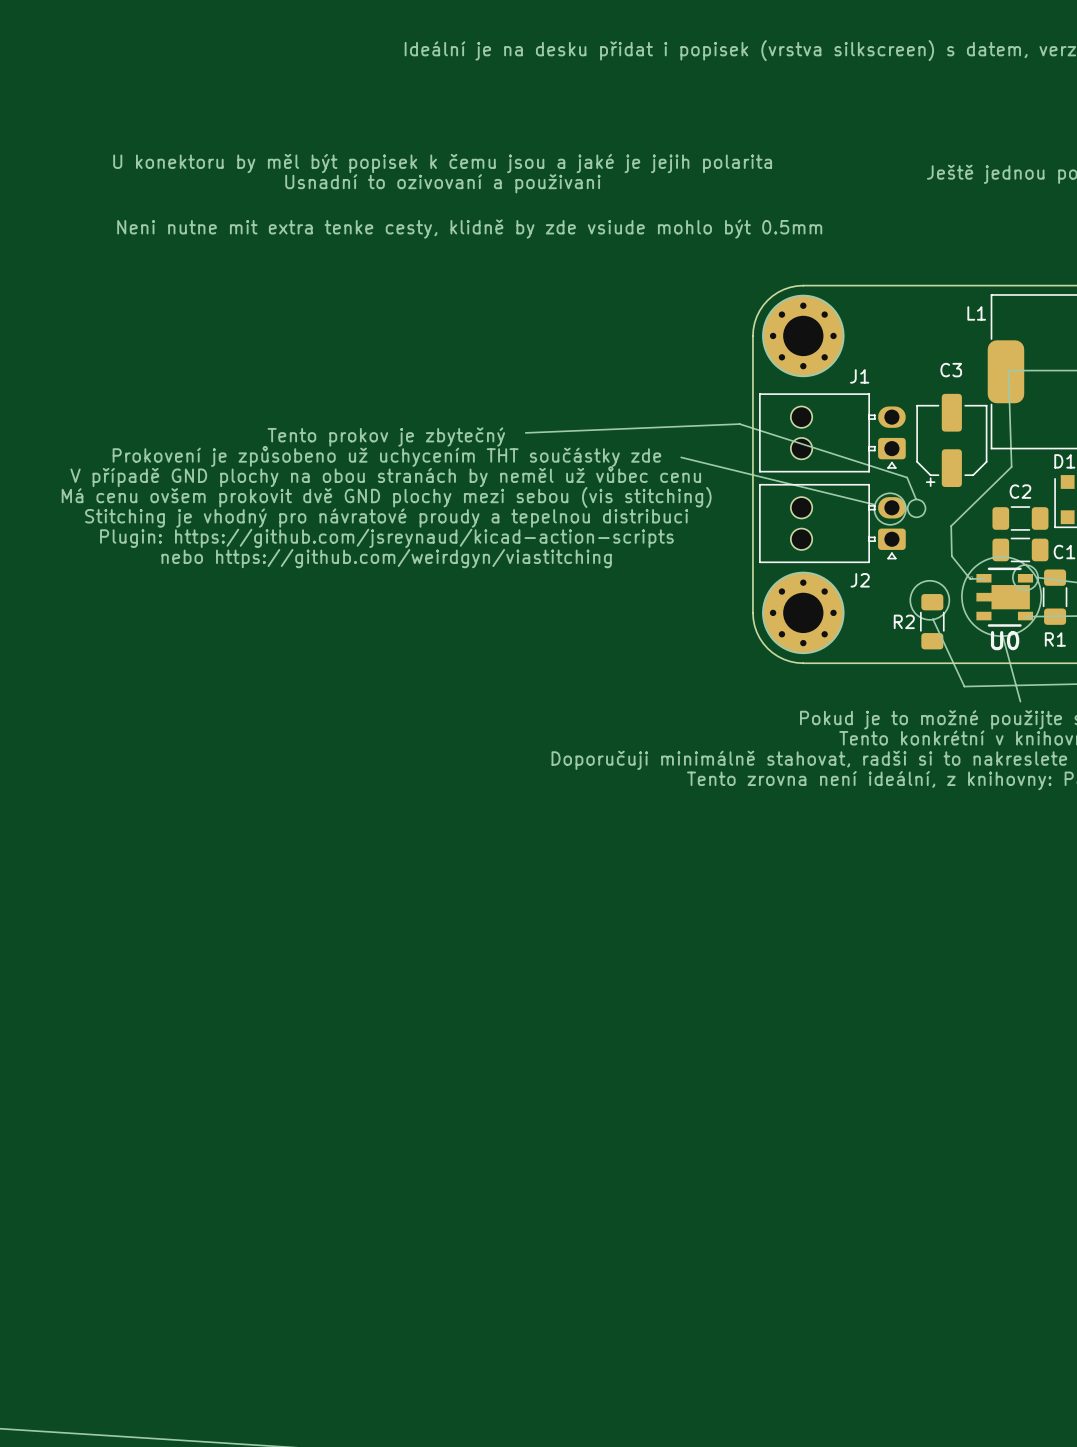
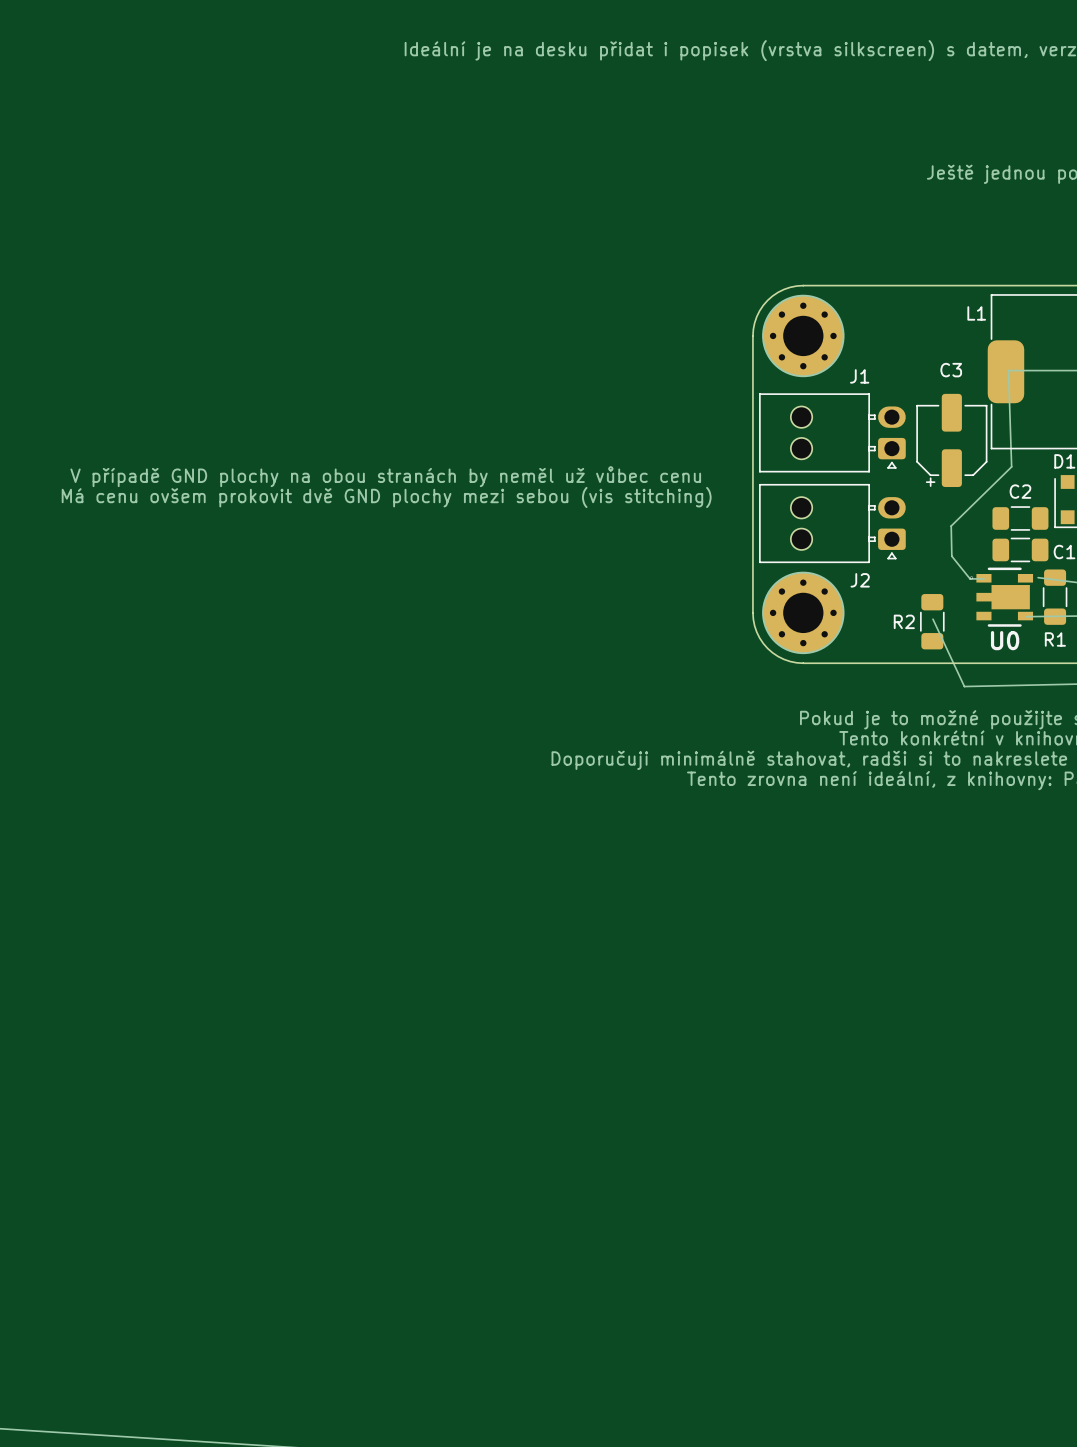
text: U konektoru by měl být popisek k čemu jsou a jaké je jejih polarita (442, 163) -> none
text: Usnadní to ozivovaní a použivani (442, 183) -> none
text: Neni nutne mit extra tenke cesty, klidně by zde vsiude mohlo být 0.5mm (469, 229) -> none
line: (525, 432) (739, 424) (907, 477) (915, 498) -> none
text: Tento prokov je zbytečný (386, 436) -> none
text: Prokovení je způsobeno už uchycením THT součástky zde (386, 456) -> none
line: (681, 457) (874, 504) -> none
drawing: [873, 492, 927, 526] -> none
text: Stitching je vhodný pro návratové proudy a tepelnou distribuci (386, 518) -> none
text: Plugin: https://github.com/jsreynaud/kicad-action-scripts (386, 538) -> none
drawing: [909, 556, 1042, 637] -> none
text: nebo https://github.com/weirdgyn/viastitching (386, 558) -> none
line: (1002, 636) (1020, 701) -> none

